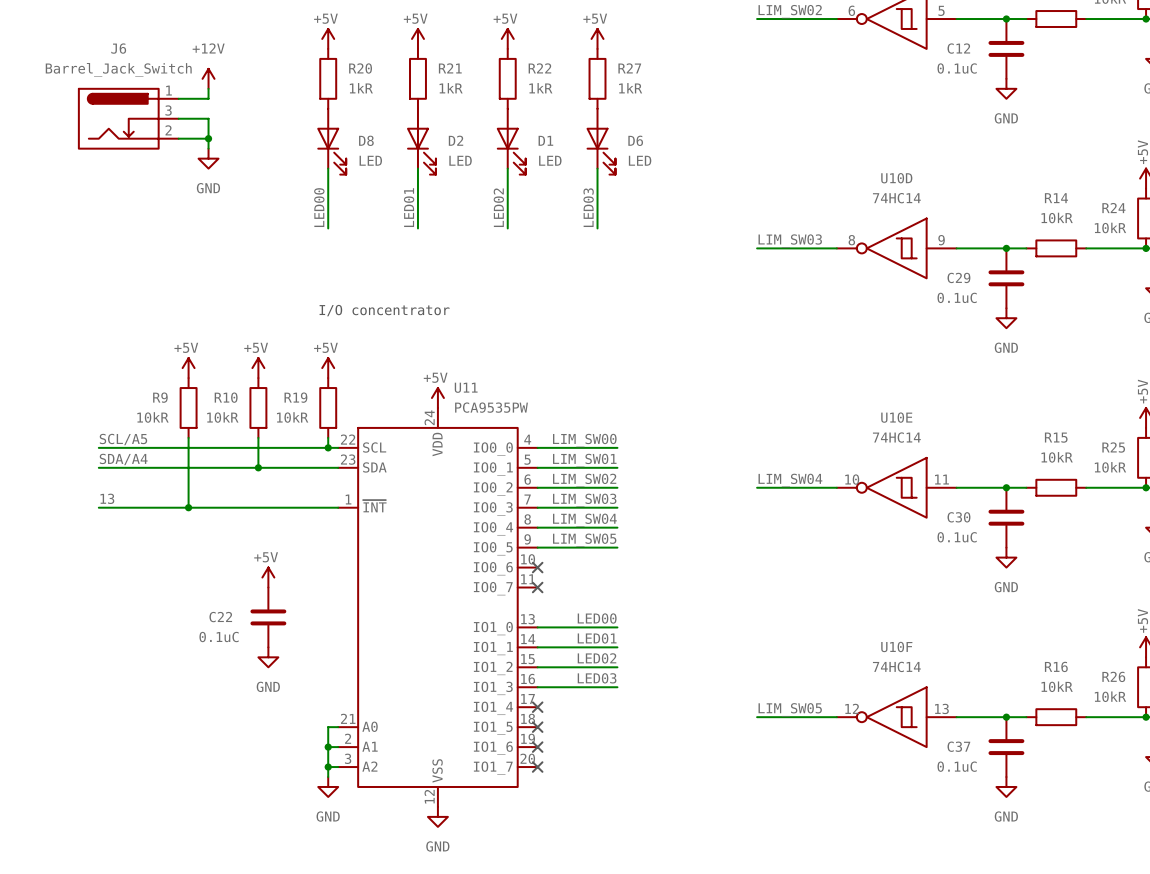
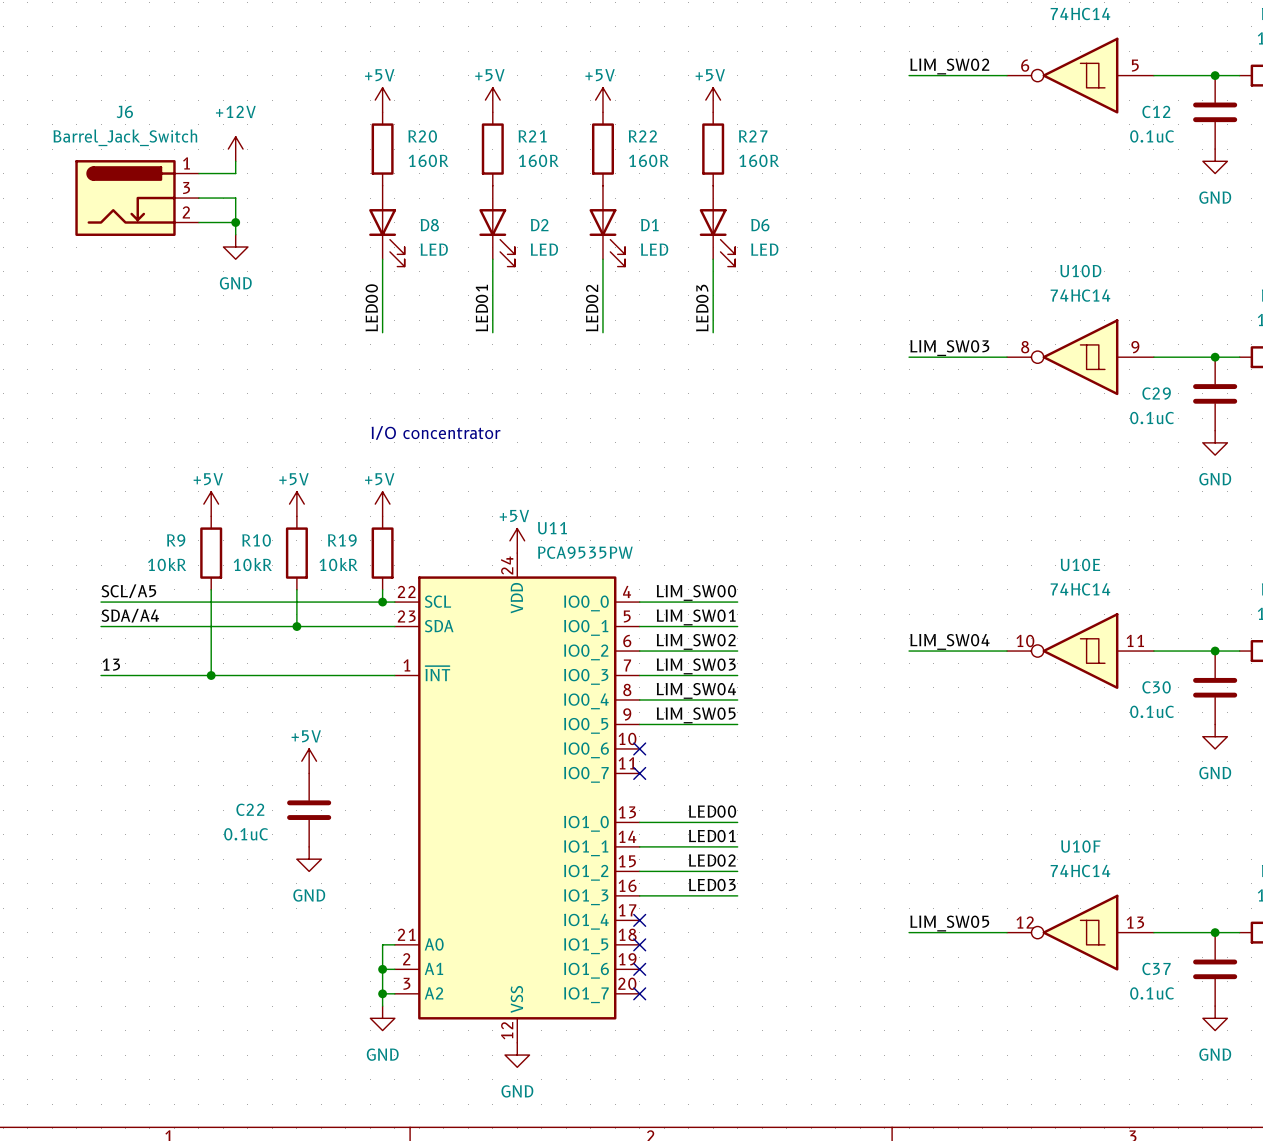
R20 value: 1kR (361, 88) -> 160R (428, 160)
R21 value: 1kR (451, 88) -> 160R (538, 160)
R22 value: 1kR (540, 88) -> 160R (648, 160)
R27 value: 1kR (630, 88) -> 160R (759, 160)

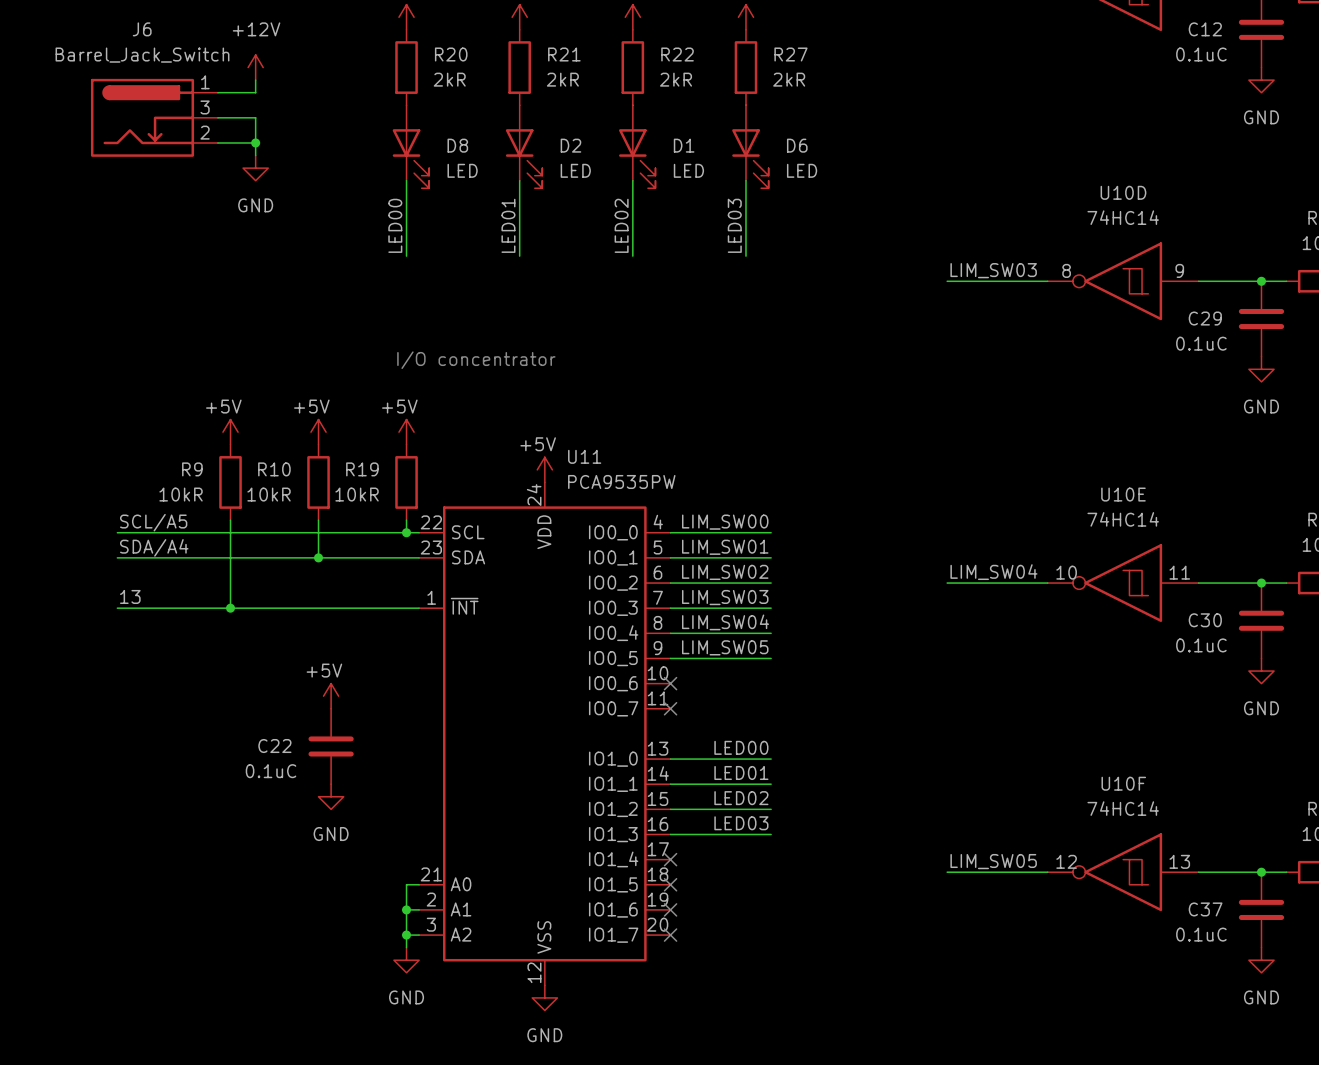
R20 value: 160R (428, 160) -> 2kR (449, 79)
R21 value: 160R (538, 160) -> 2kR (562, 79)
R22 value: 160R (648, 160) -> 2kR (676, 79)
R27 value: 160R (759, 160) -> 2kR (789, 79)

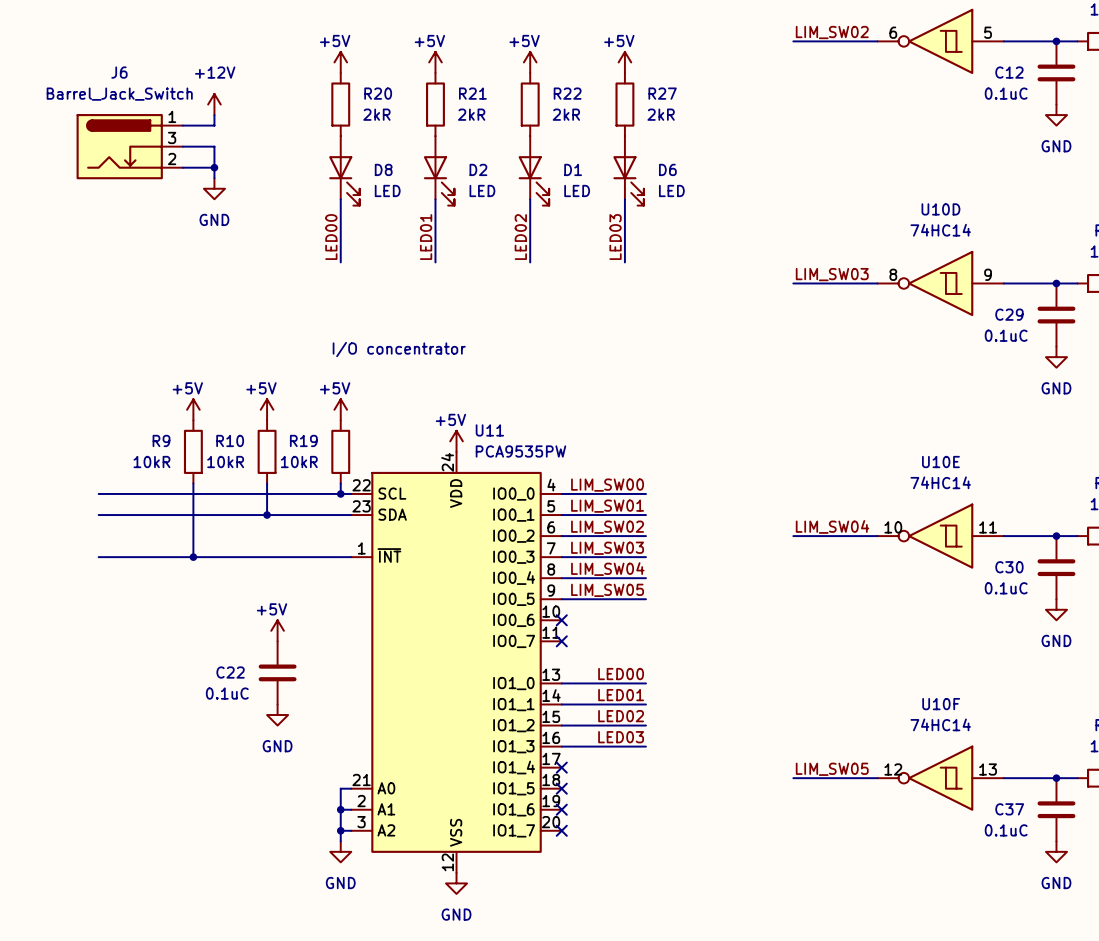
label: SCL/A5 (153, 522) -> none
label: SDA/A4 (154, 547) -> none
label: 13 (130, 596) -> none

